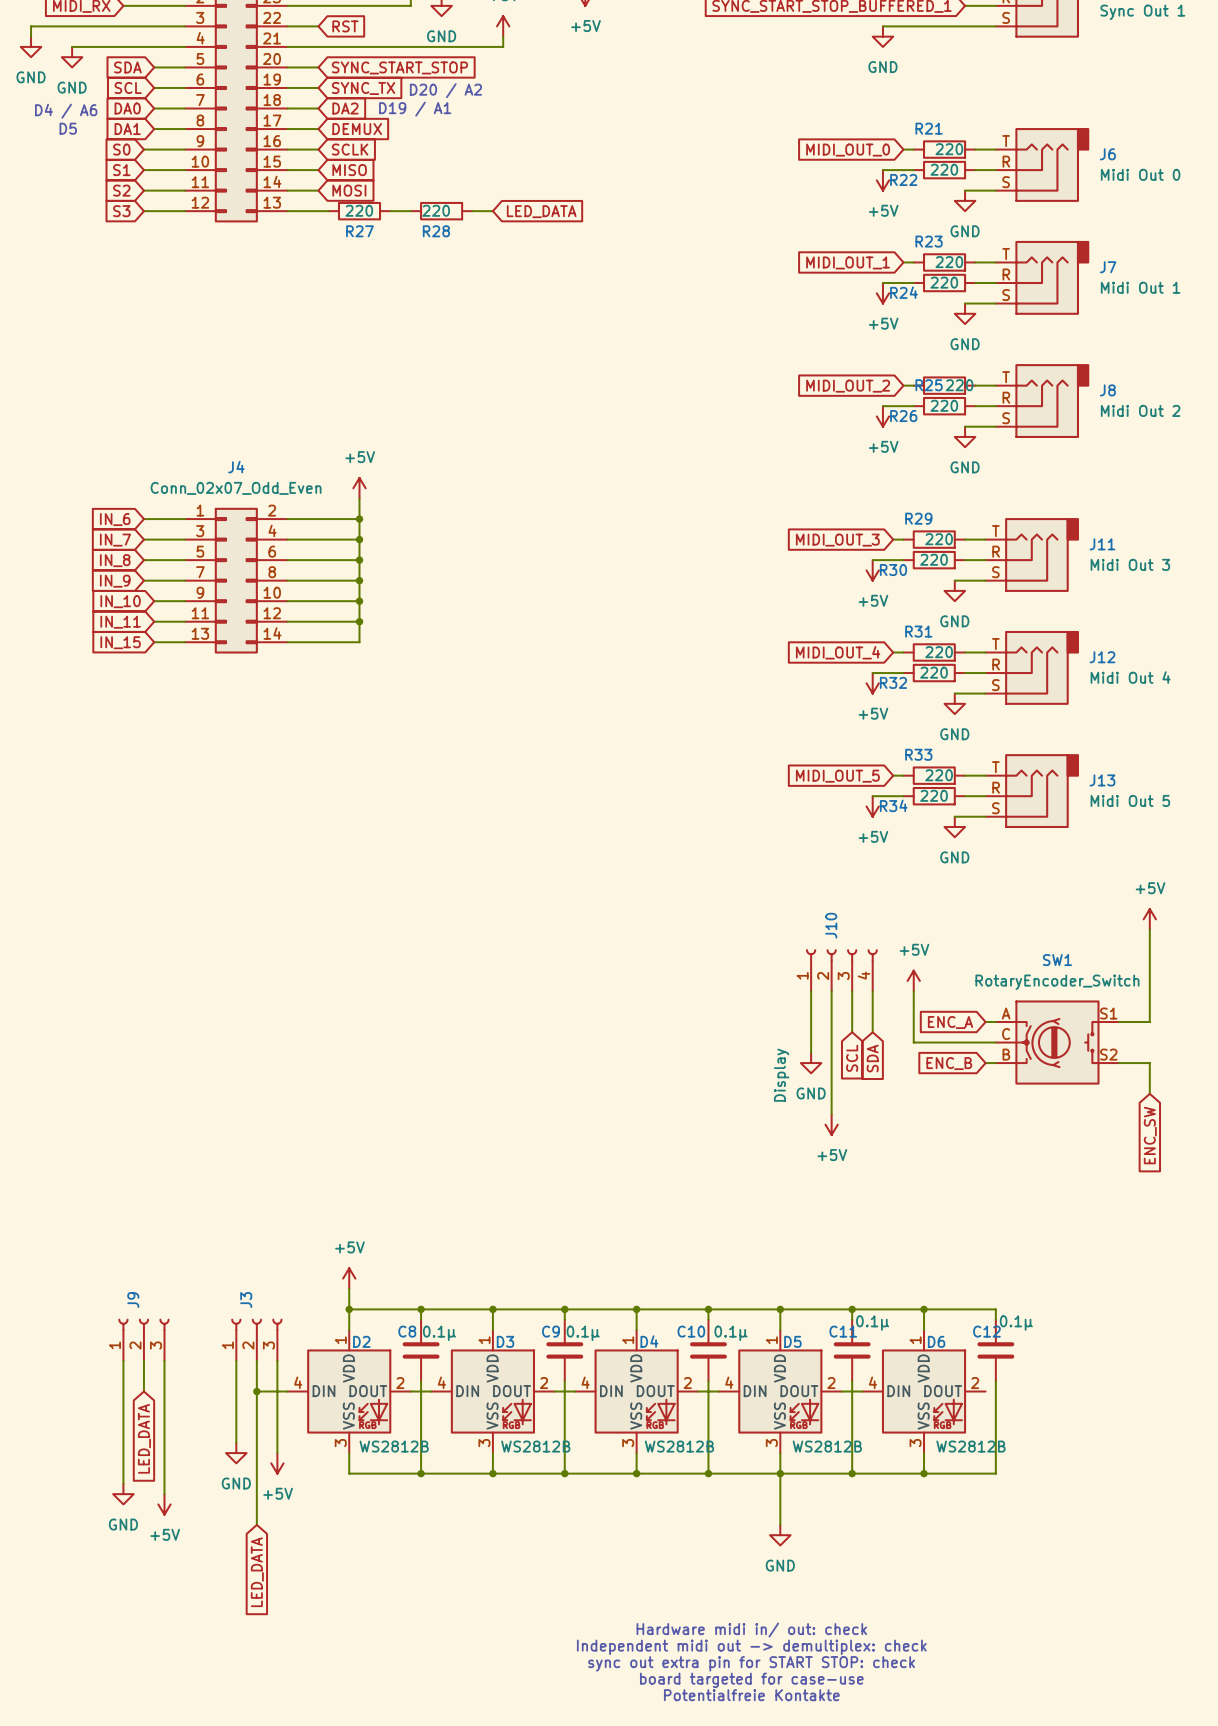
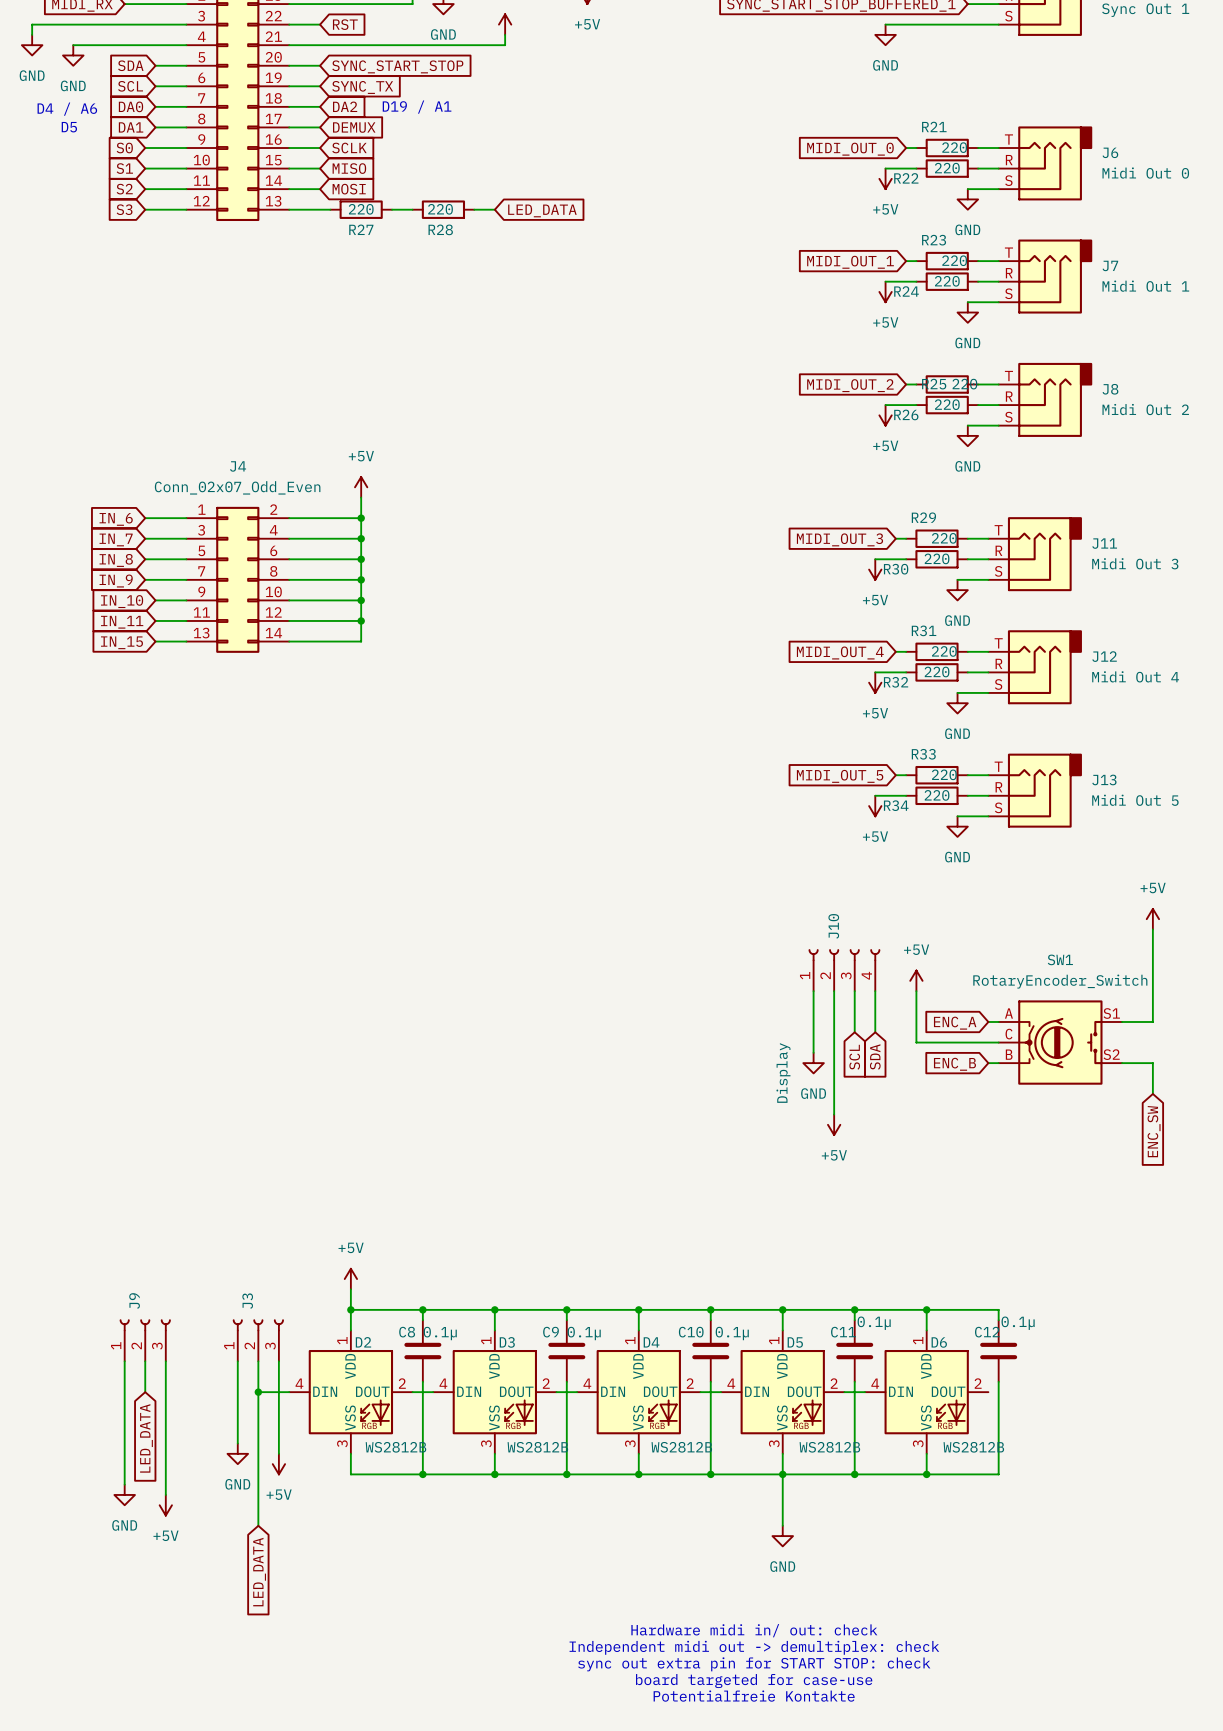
text: D20 / A2 (445, 90) -> none

